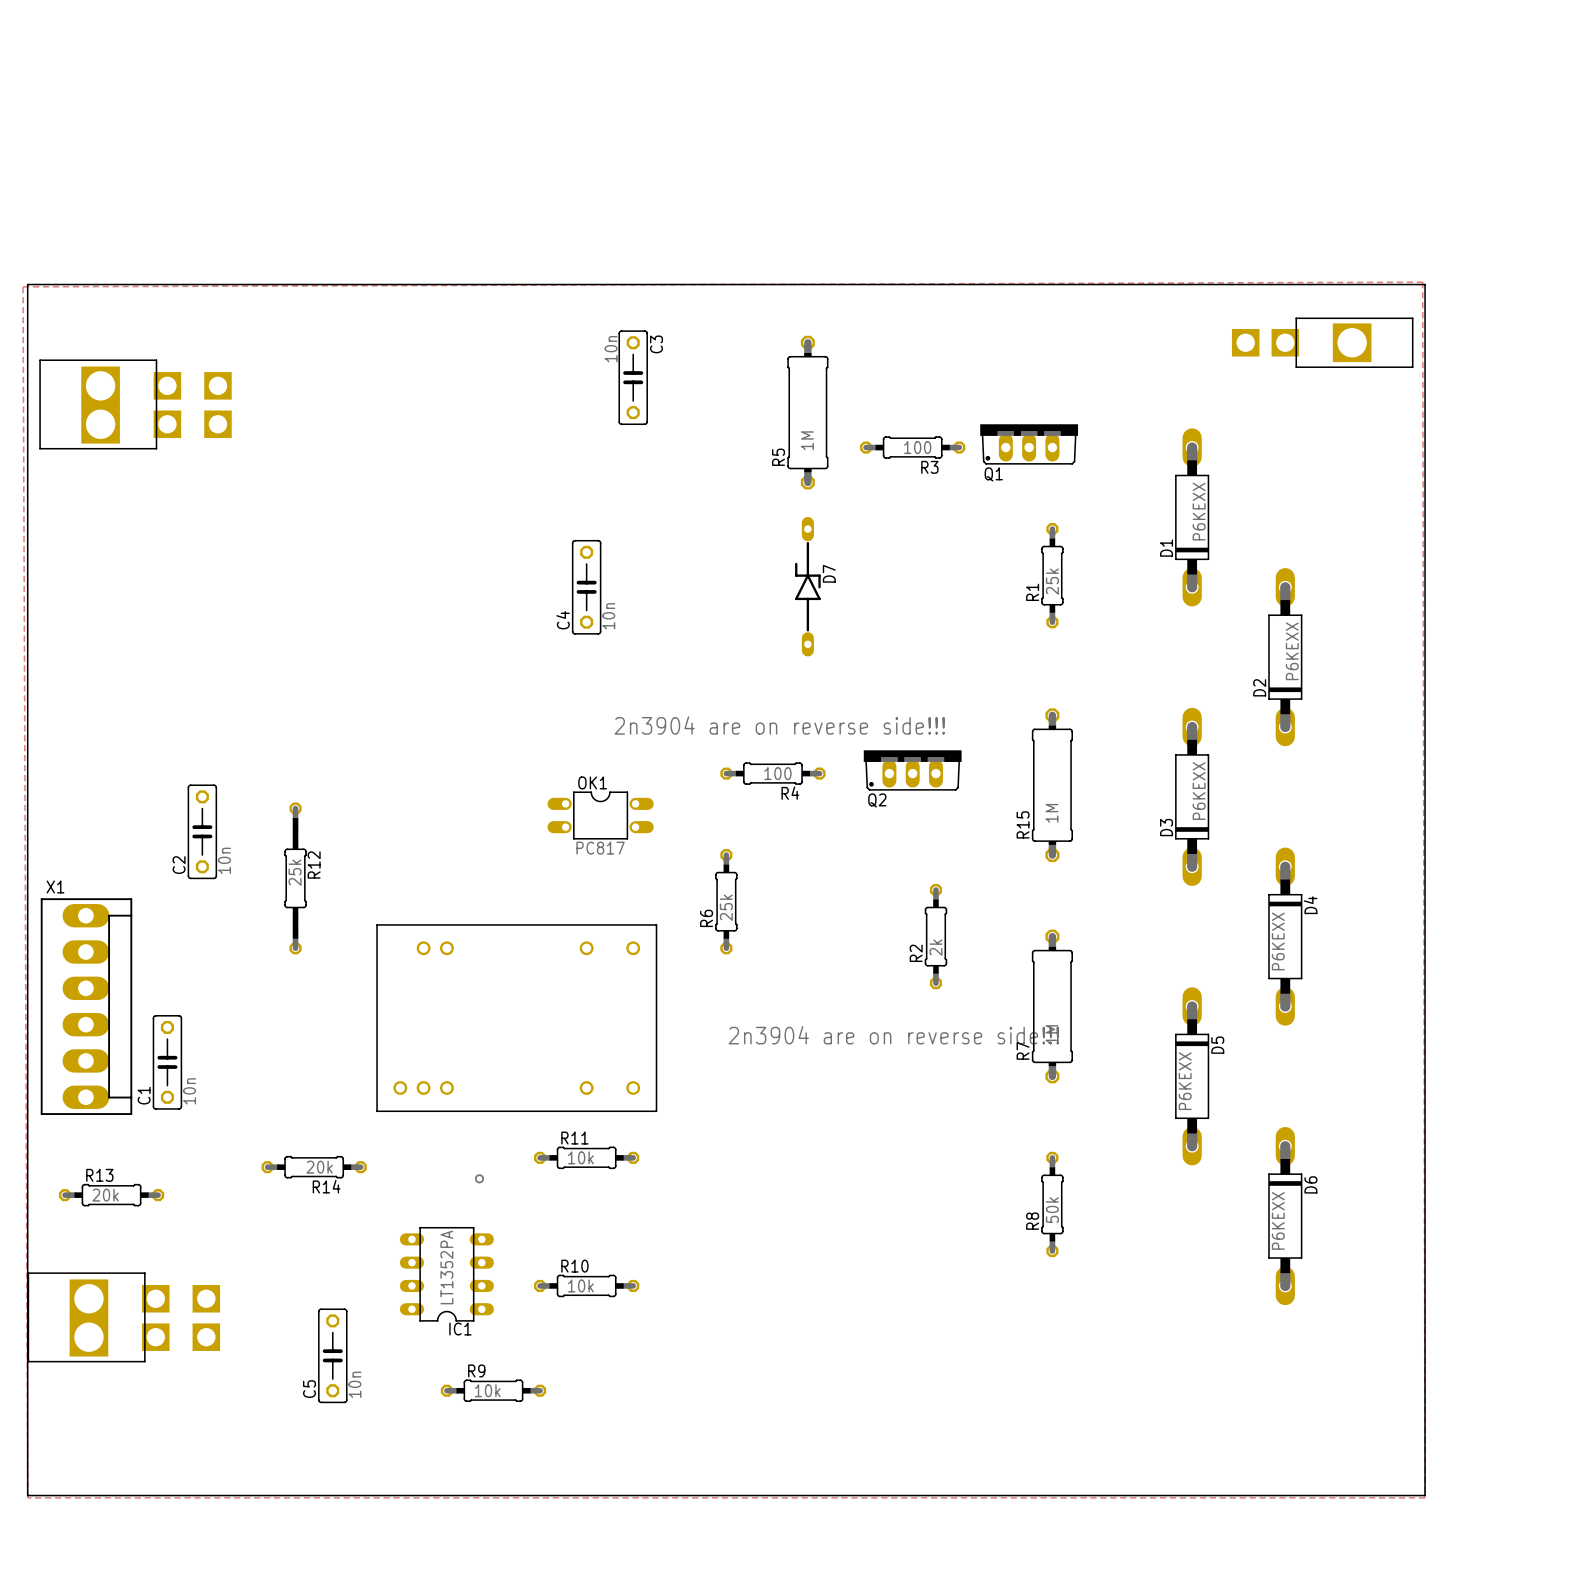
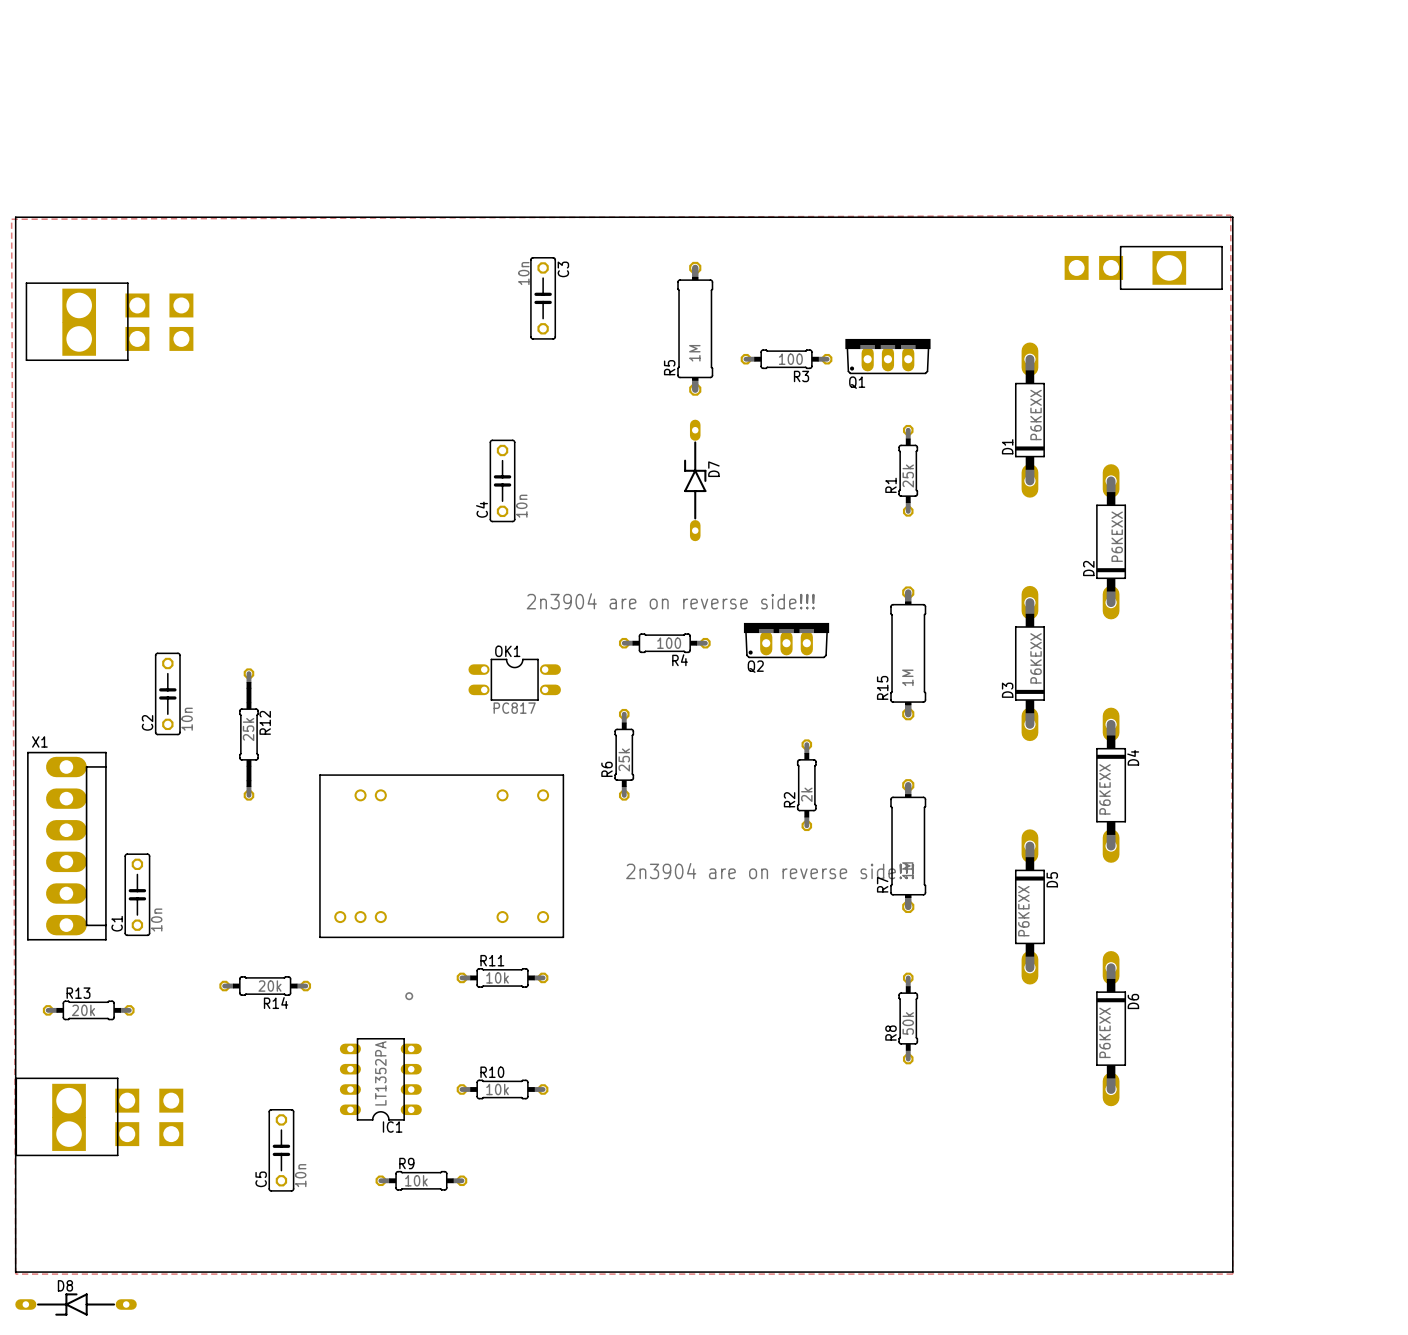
D8: none -> (76, 1304)

